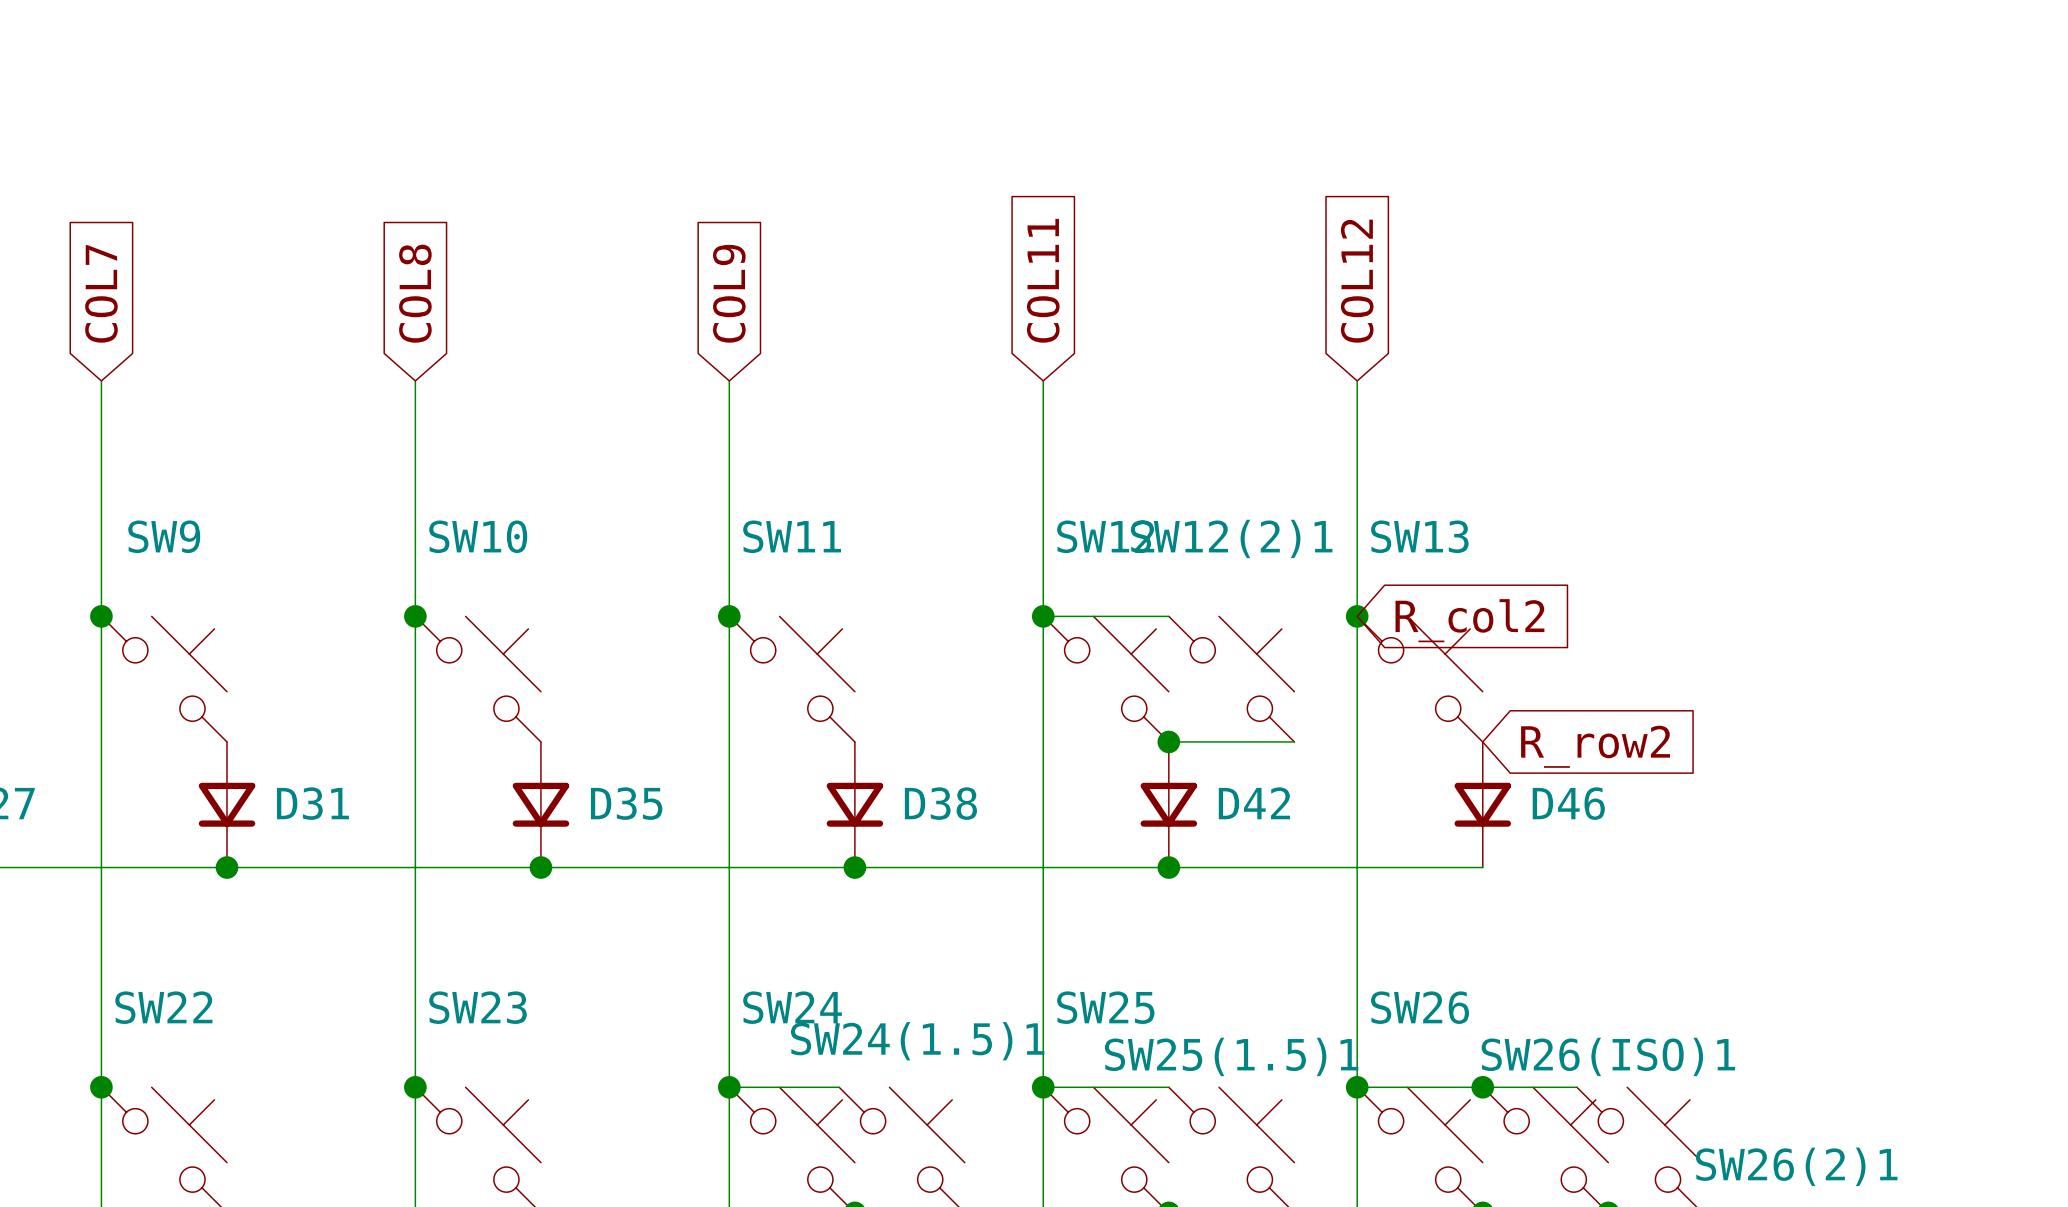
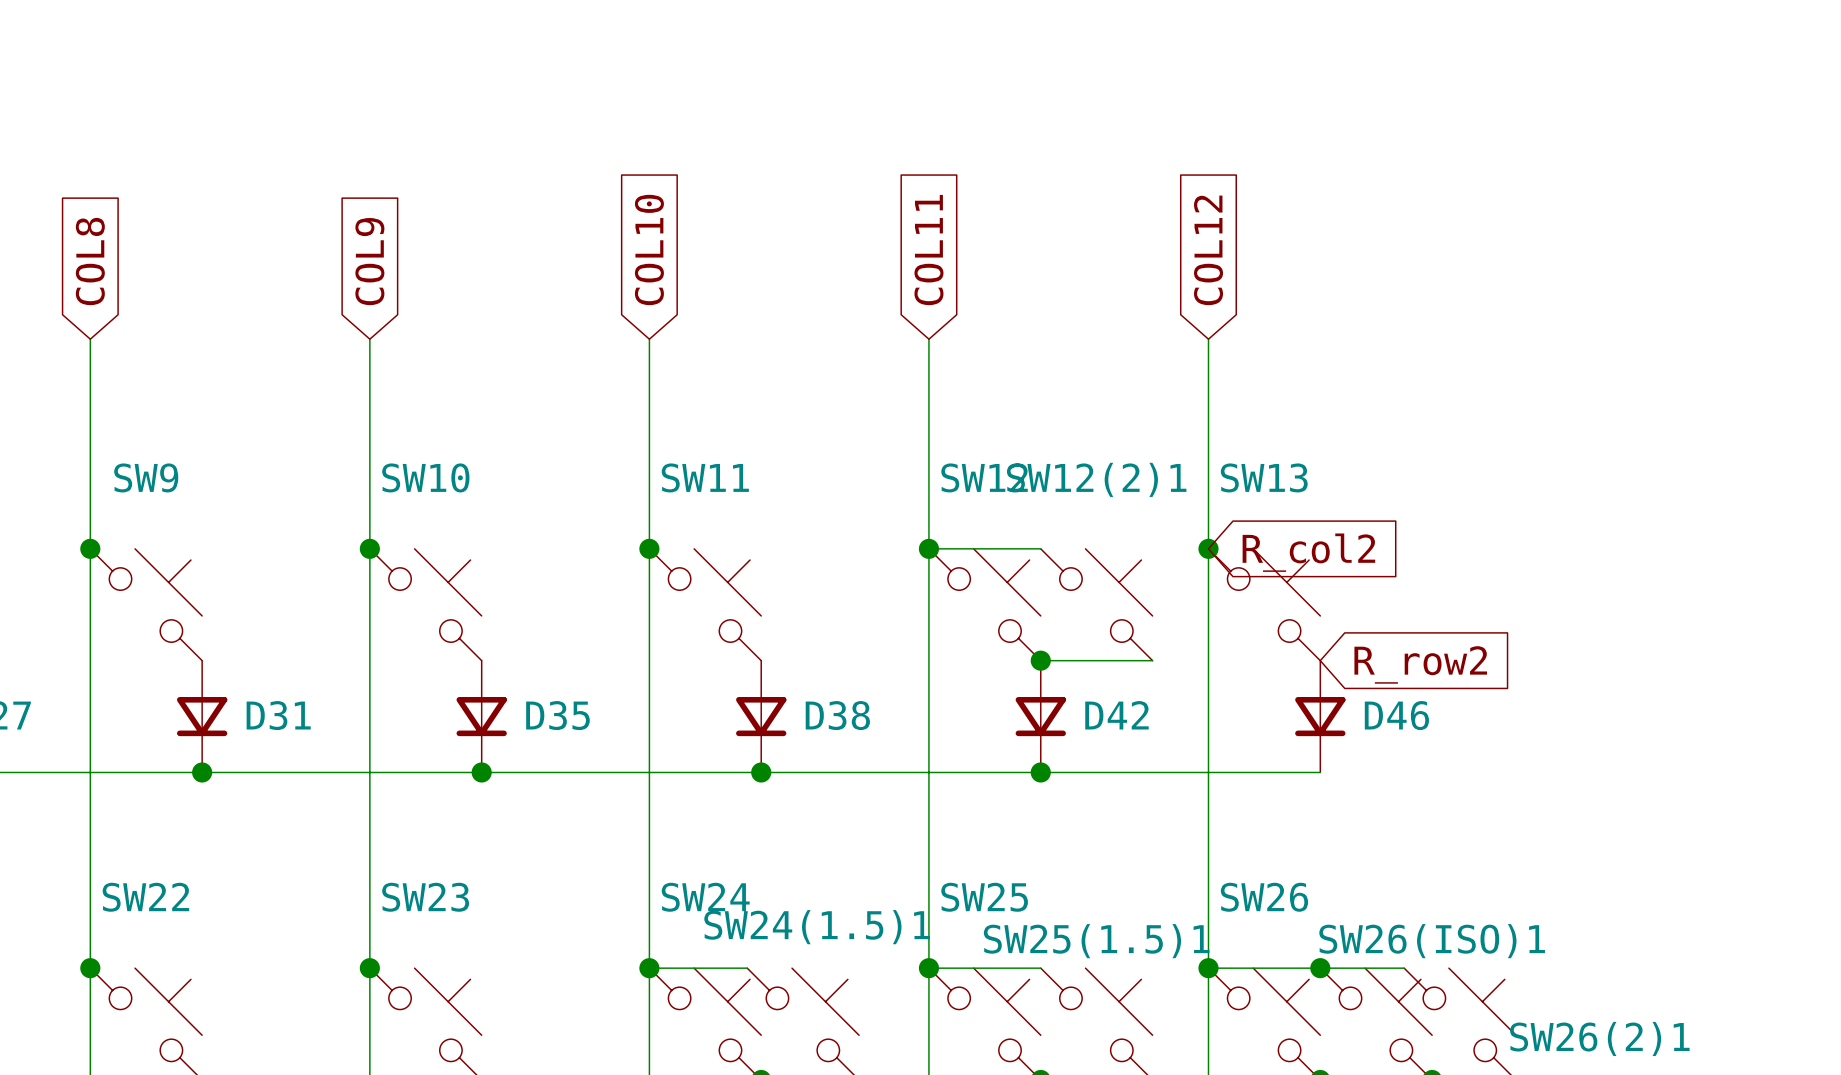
global label: COL7 (101, 293) -> COL8 (90, 261)
global label: COL8 (415, 293) -> COL9 (369, 261)
global label: COL9 (729, 293) -> COL10 (649, 249)

